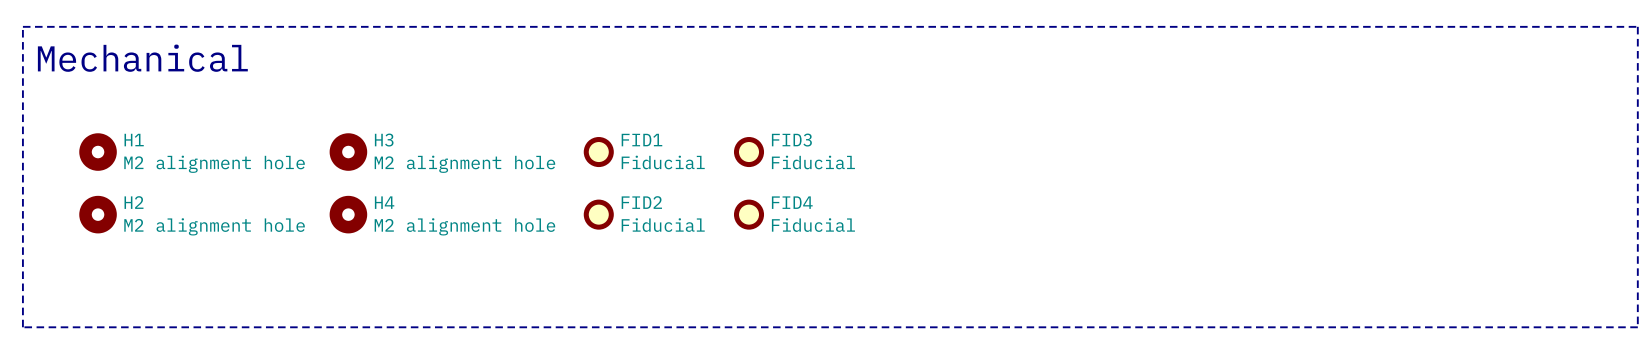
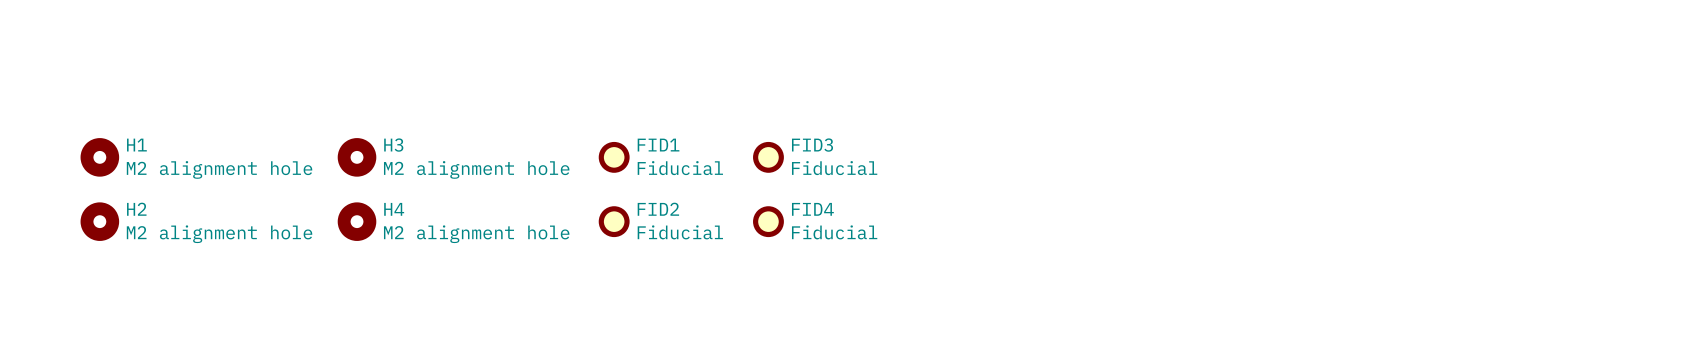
line: (22, 26) (22, 327) (1637, 327) (1637, 26) (22, 26) -> none
text: Mechanical (142, 58) -> none

